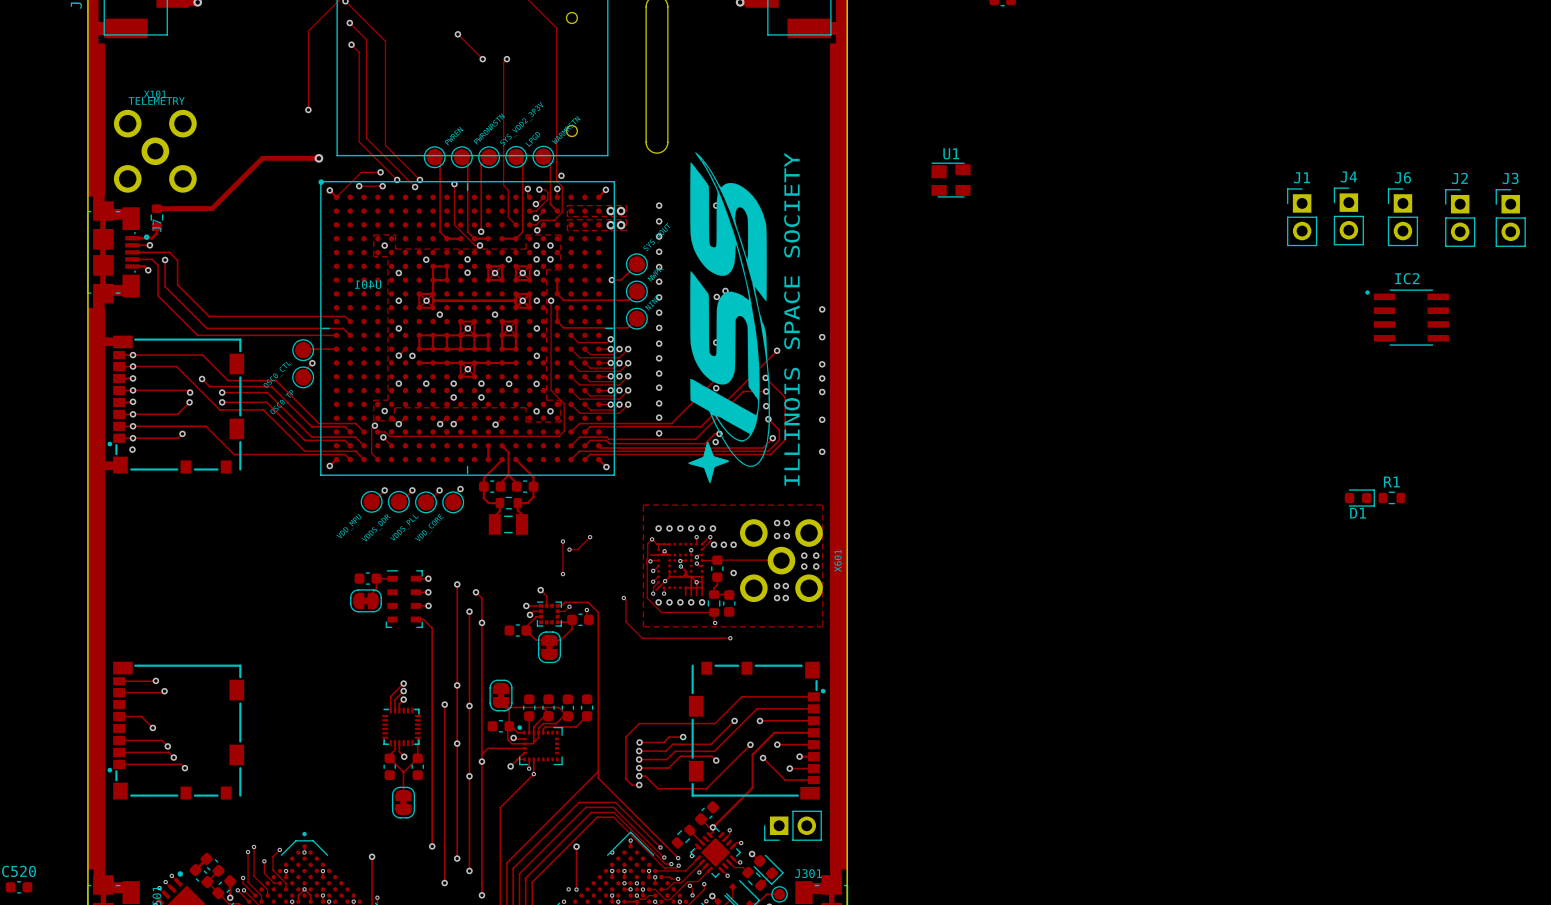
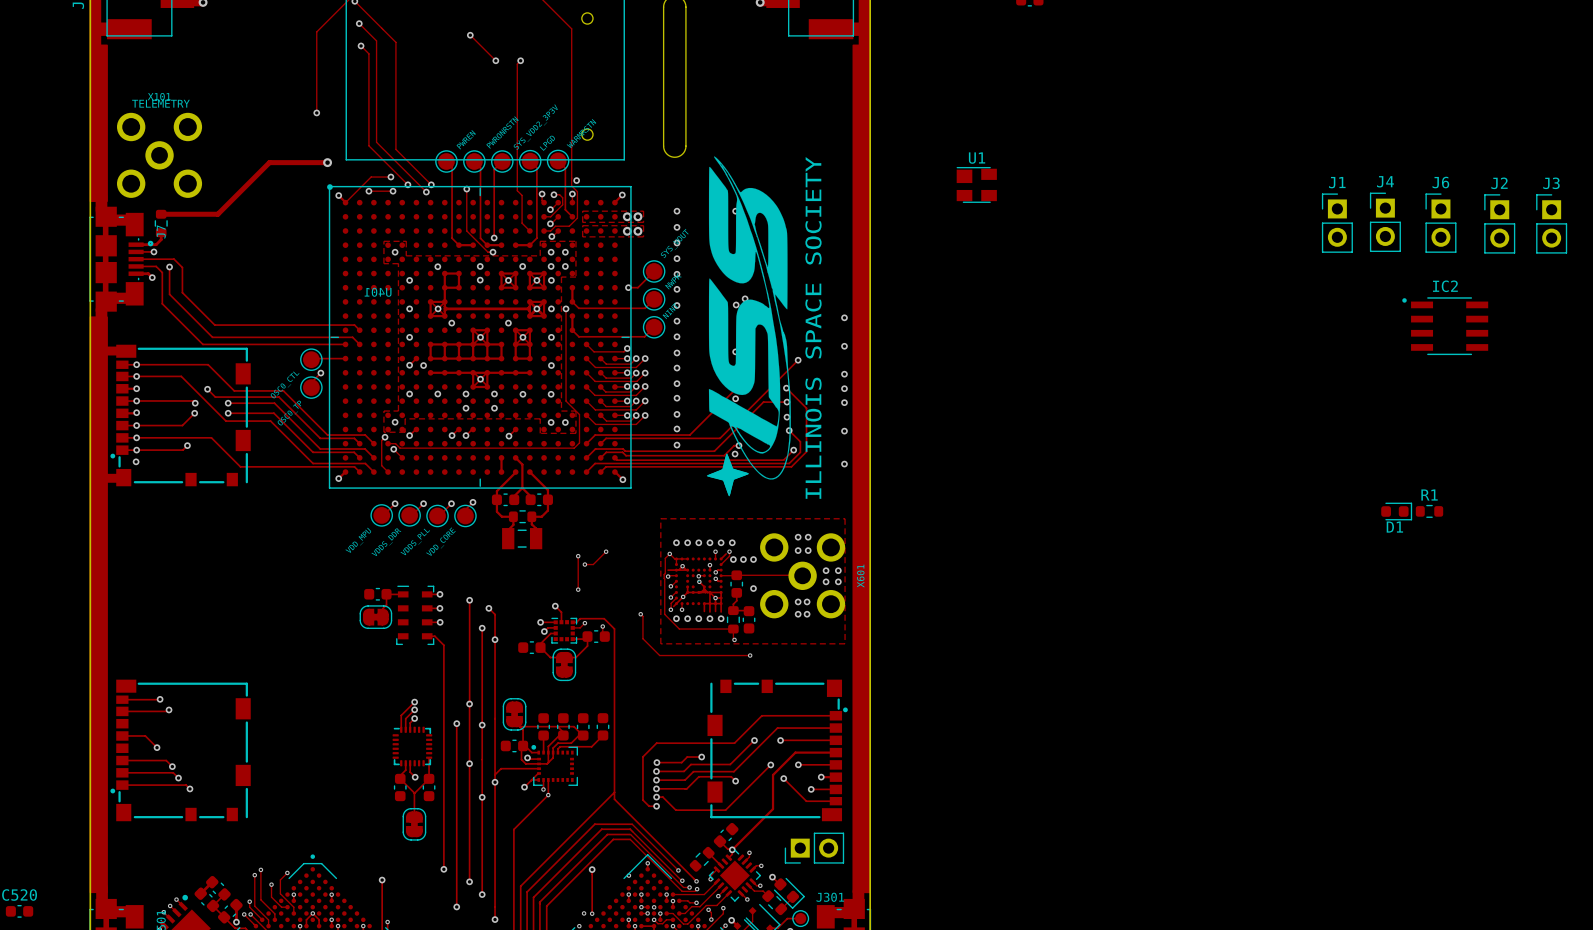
track: (304, 846) (304, 852) -> none
via: (304, 852) -> none

